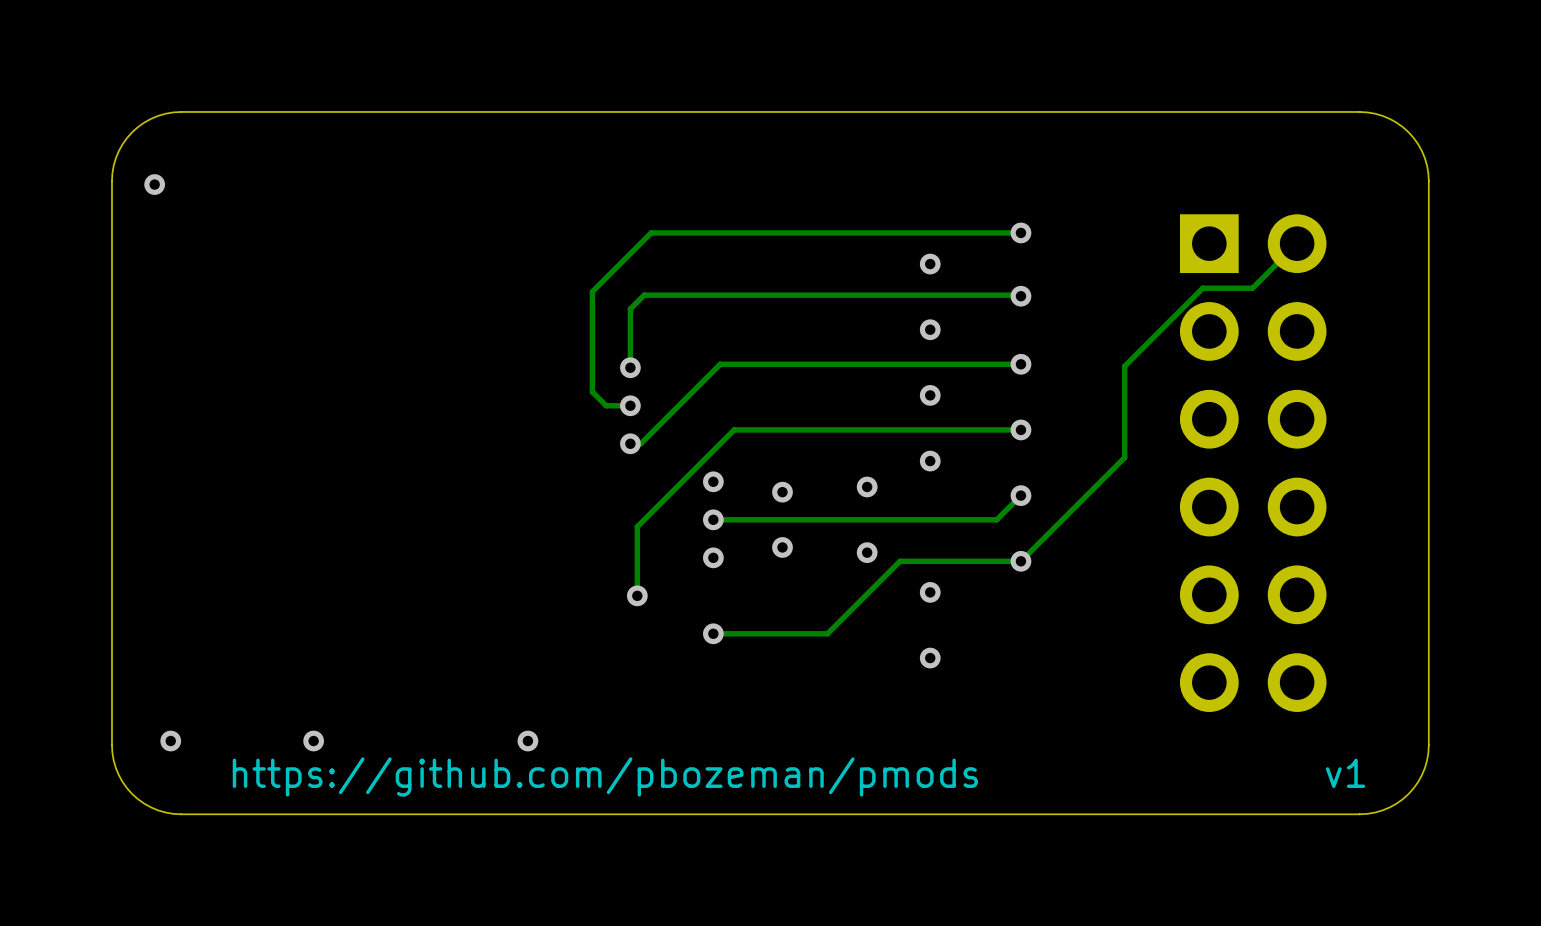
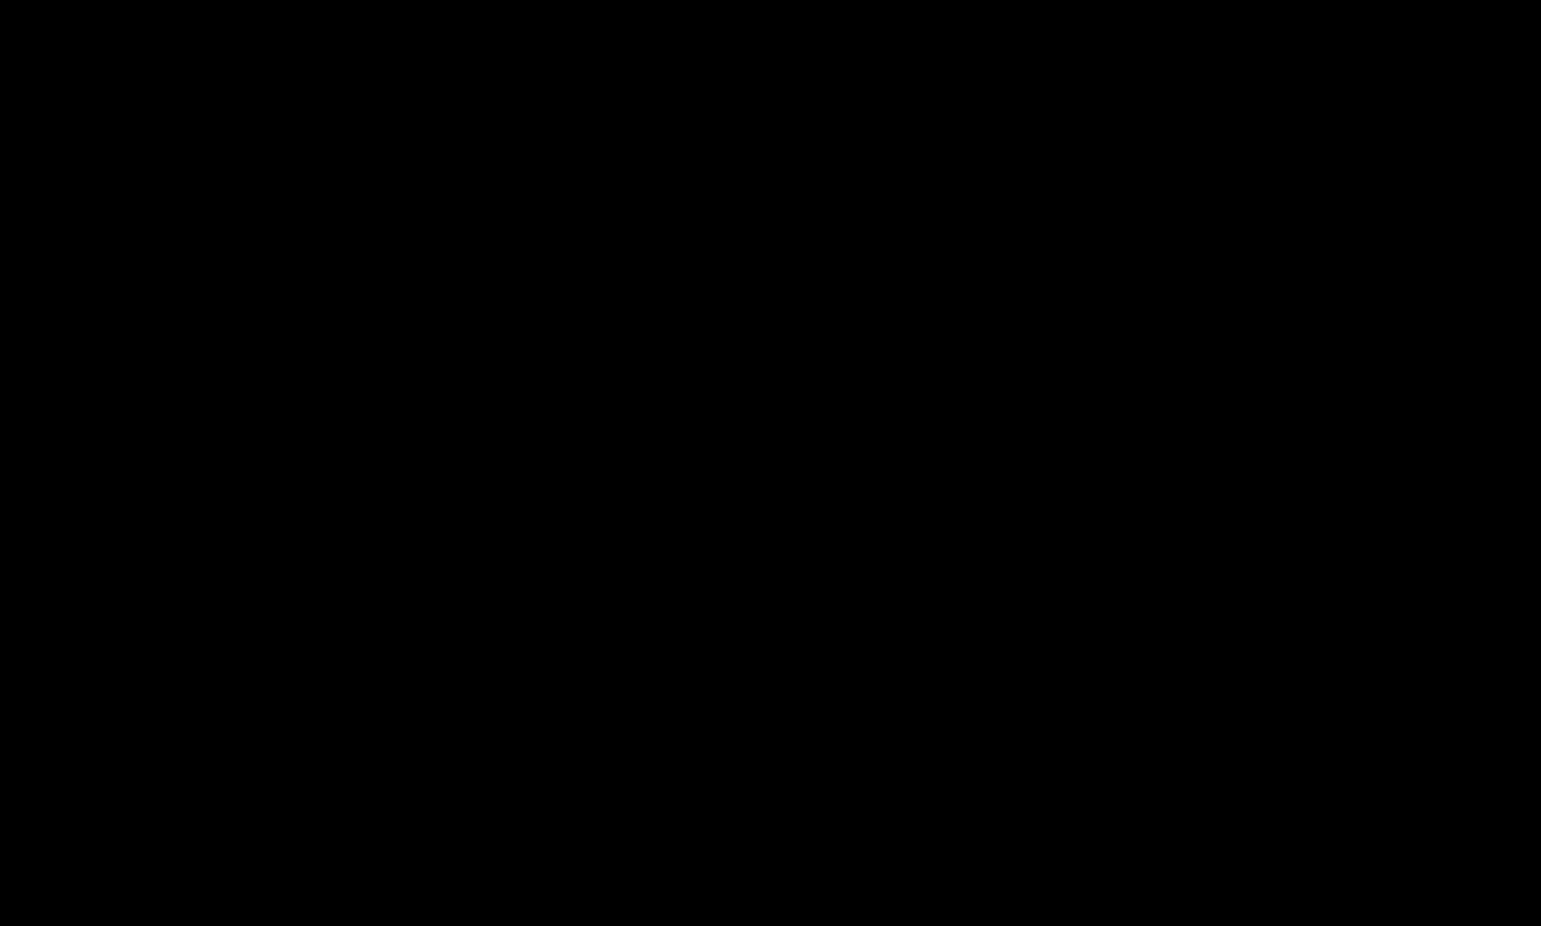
board edge: (1359, 111) (181, 111) (165, 113) (151, 118) (132, 132) (122, 144) (115, 158) (111, 181) (111, 745) (113, 760) (118, 775) (132, 794) (144, 803) (158, 810) (181, 814) (1359, 814) (1375, 812) (1389, 807) (1402, 799) (1413, 788) (1424, 767) (1428, 752) (1428, 181) (1424, 158) (1418, 144) (1408, 132) (1396, 122) (1382, 115) (1359, 111) -> none
via: (154, 184) -> none
track: (1020, 232) (651, 232) (592, 291) (592, 391) (606, 405) (630, 405) -> none
via: (1020, 232) -> none
track: (1297, 243) (1252, 288) (1202, 288) (1124, 366) (1124, 457) (1020, 561) (900, 561) (827, 633) (713, 633) -> none
via: (930, 264) -> none
track: (1020, 296) (644, 295) (630, 308) (630, 367) -> none
via: (1020, 296) -> none
via: (930, 329) -> none
track: (1020, 364) (720, 364) (640, 443) (630, 443) -> none
via: (1020, 364) -> none
via: (630, 367) -> none
via: (930, 395) -> none
via: (630, 405) -> none
track: (1020, 429) (734, 429) (637, 526) (637, 595) -> none
via: (1020, 429) -> none
via: (630, 443) -> none
via: (930, 461) -> none
part: (1253, 463) -> none
via: (713, 481) -> none
via: (867, 486) -> none
via: (782, 492) -> none
track: (1020, 495) (996, 519) (713, 519) -> none
via: (1020, 495) -> none
via: (713, 519) -> none
via: (782, 547) -> none
via: (867, 552) -> none
via: (713, 557) -> none
via: (1020, 561) -> none
via: (930, 592) -> none
via: (637, 595) -> none
via: (713, 633) -> none
via: (930, 658) -> none
via: (170, 741) -> none
via: (313, 741) -> none
via: (527, 741) -> none
text: v1 (1345, 773) -> none
text: https://github.com/pbozeman/pmods (605, 776) -> none

